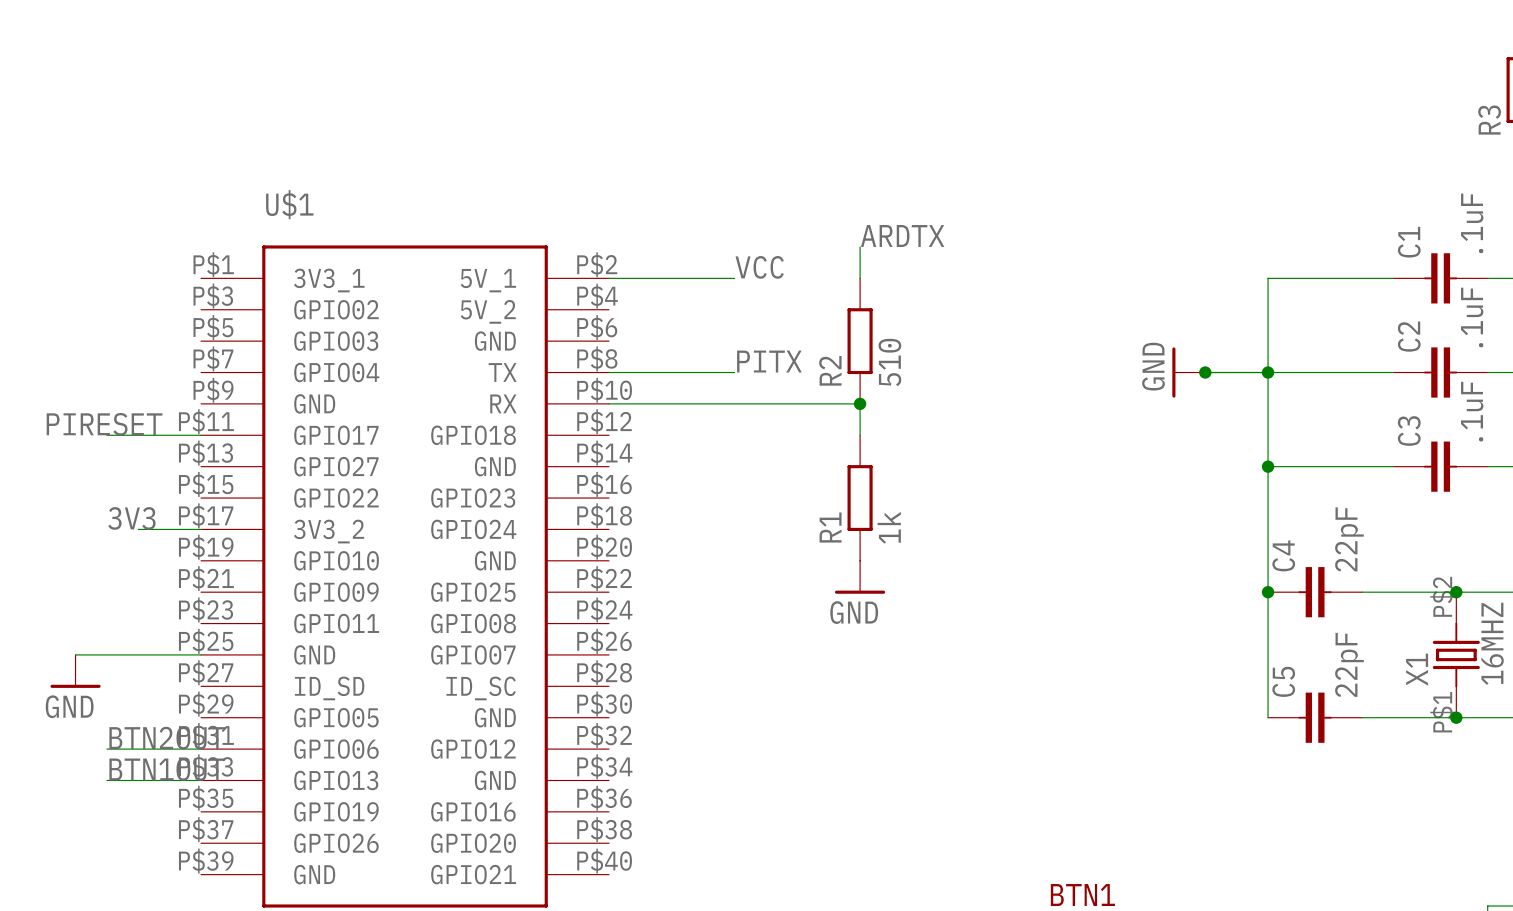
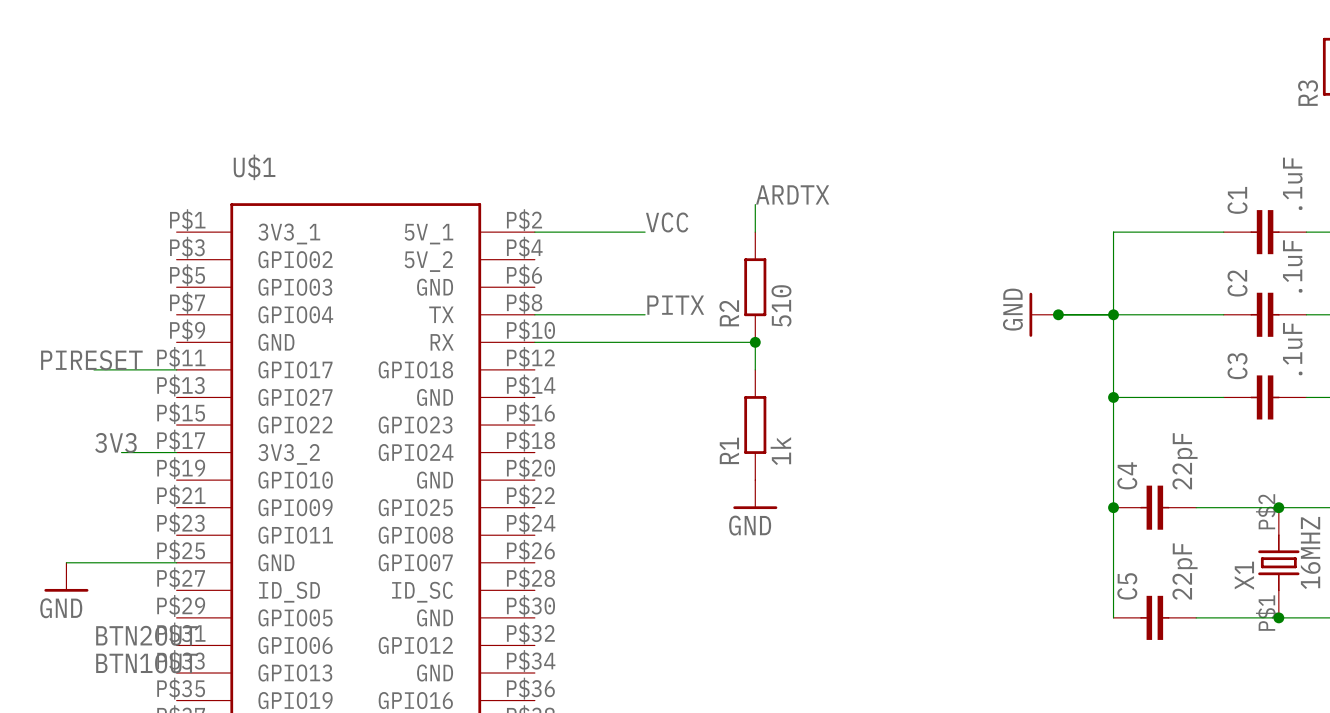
wire: (106, 749) (201, 749) -> none
wire: (106, 780) (201, 780) -> none

